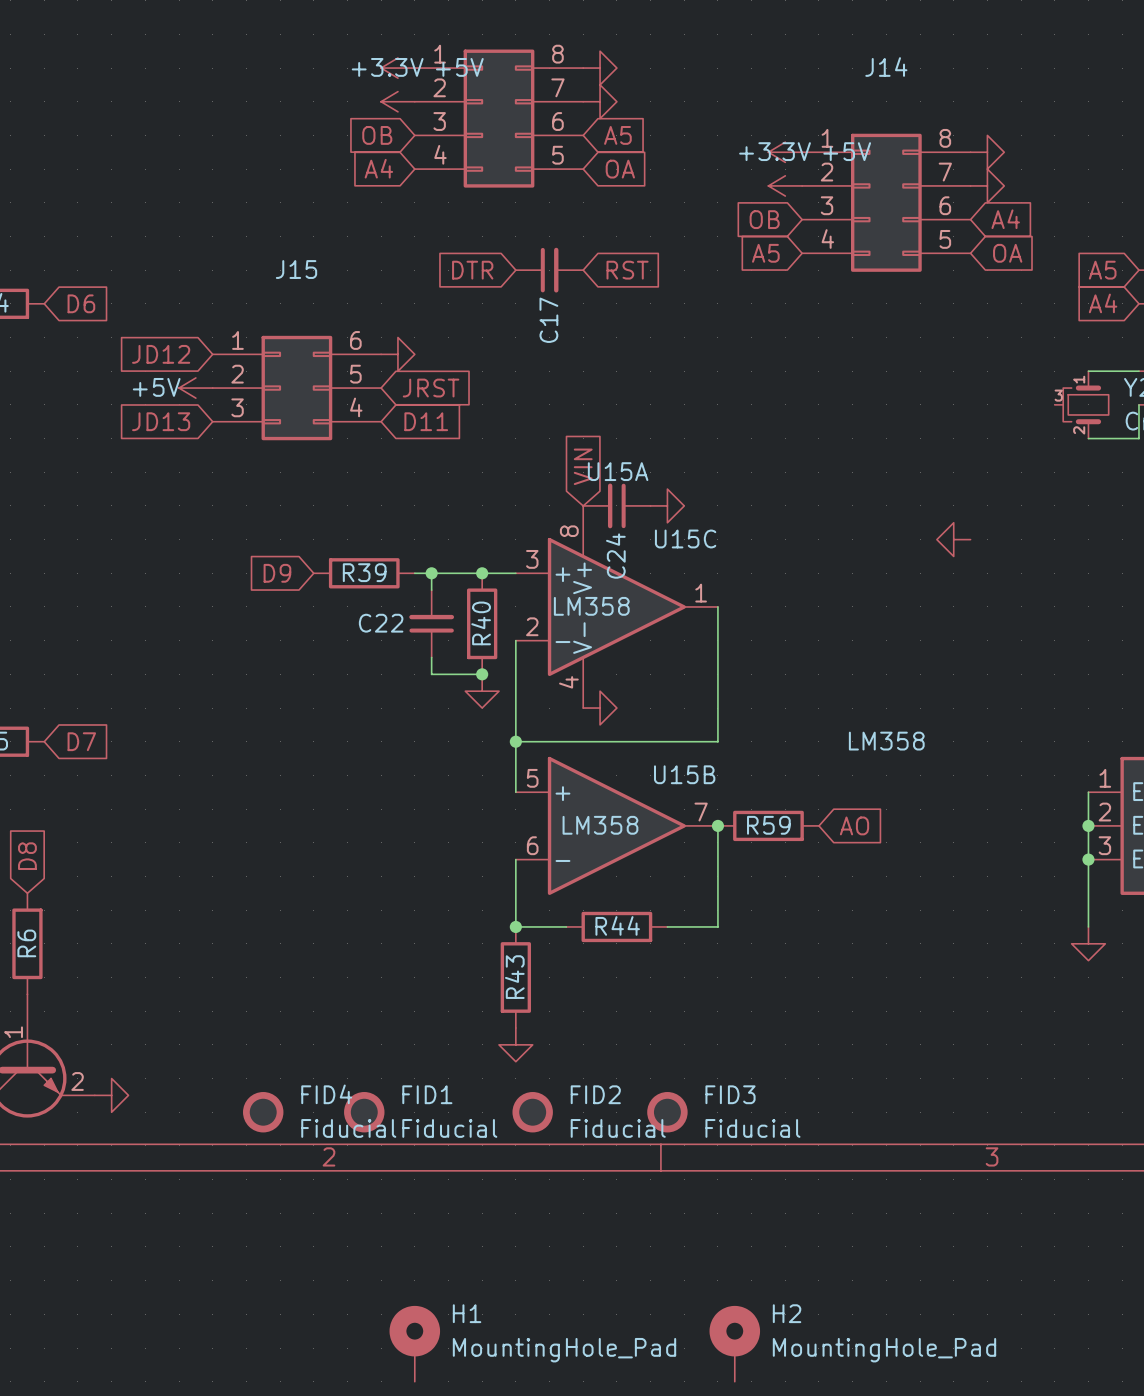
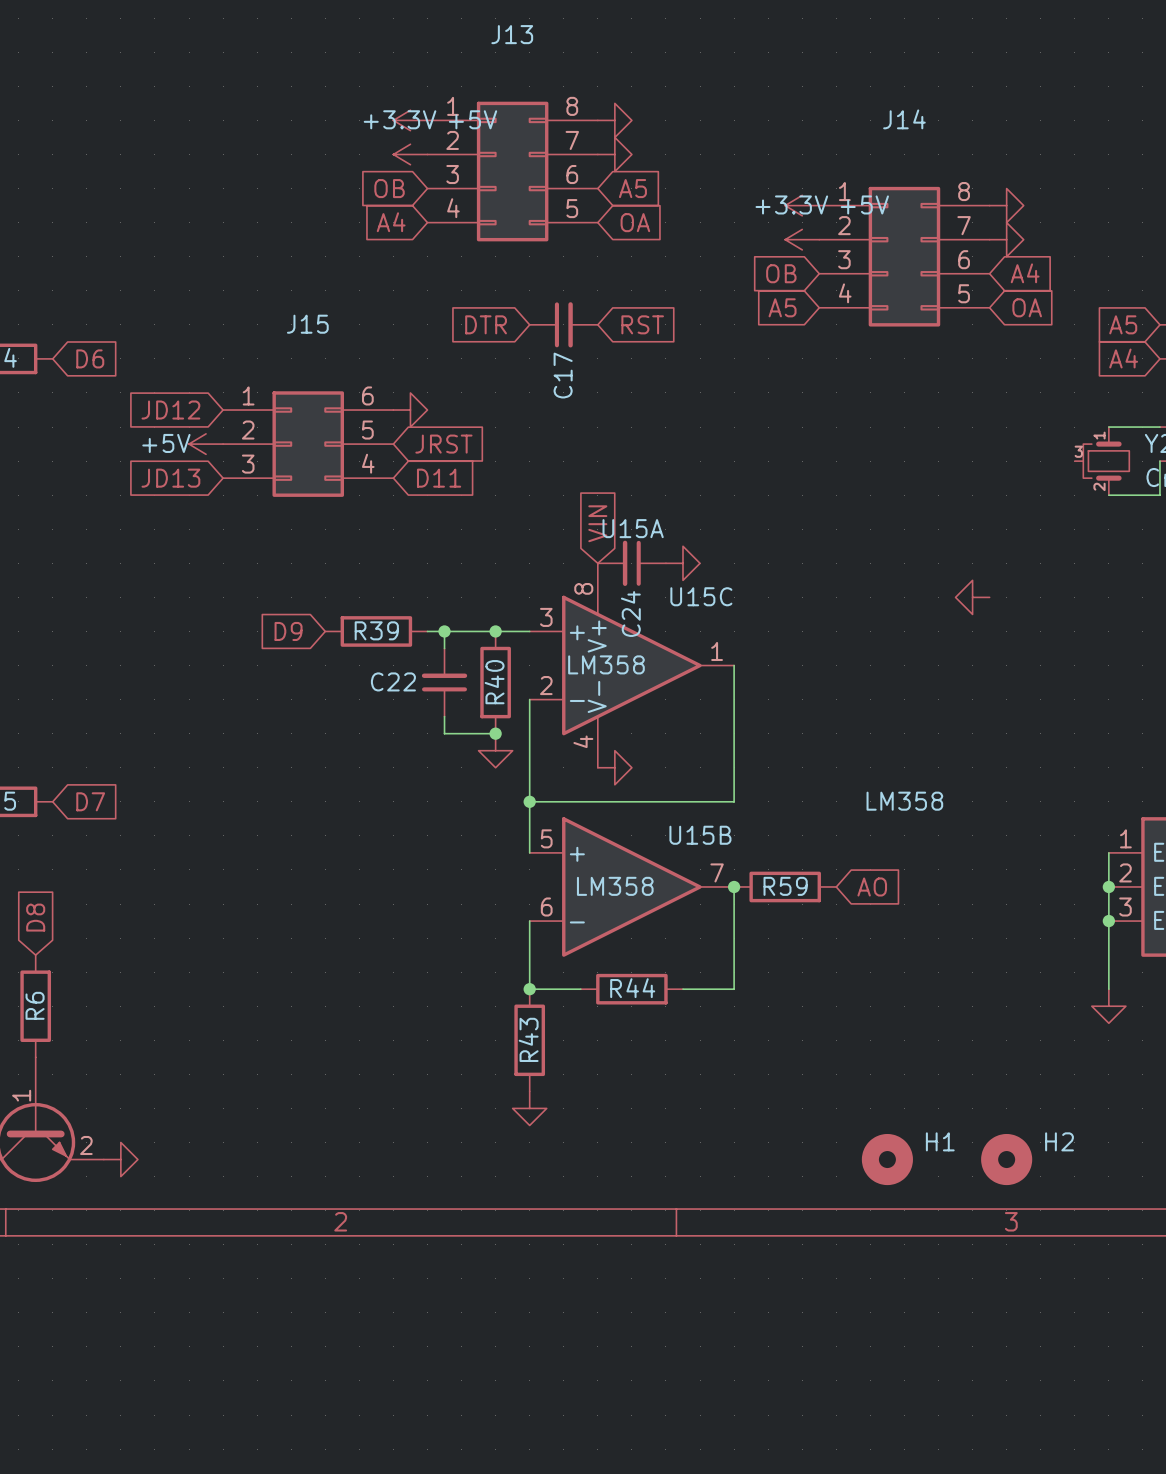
FID4: Fiducial (263, 1112) -> none
FID1: Fiducial (364, 1112) -> none
FID2: Fiducial (532, 1112) -> none
FID3: Fiducial (667, 1112) -> none
H1 symbol: [389, 1305, 441, 1382] -> [861, 1133, 913, 1186]
H2 symbol: [709, 1305, 761, 1382] -> [981, 1133, 1033, 1186]
H1 value: MountingHole_Pad (564, 1350) -> none
H2 value: MountingHole_Pad (884, 1350) -> none

